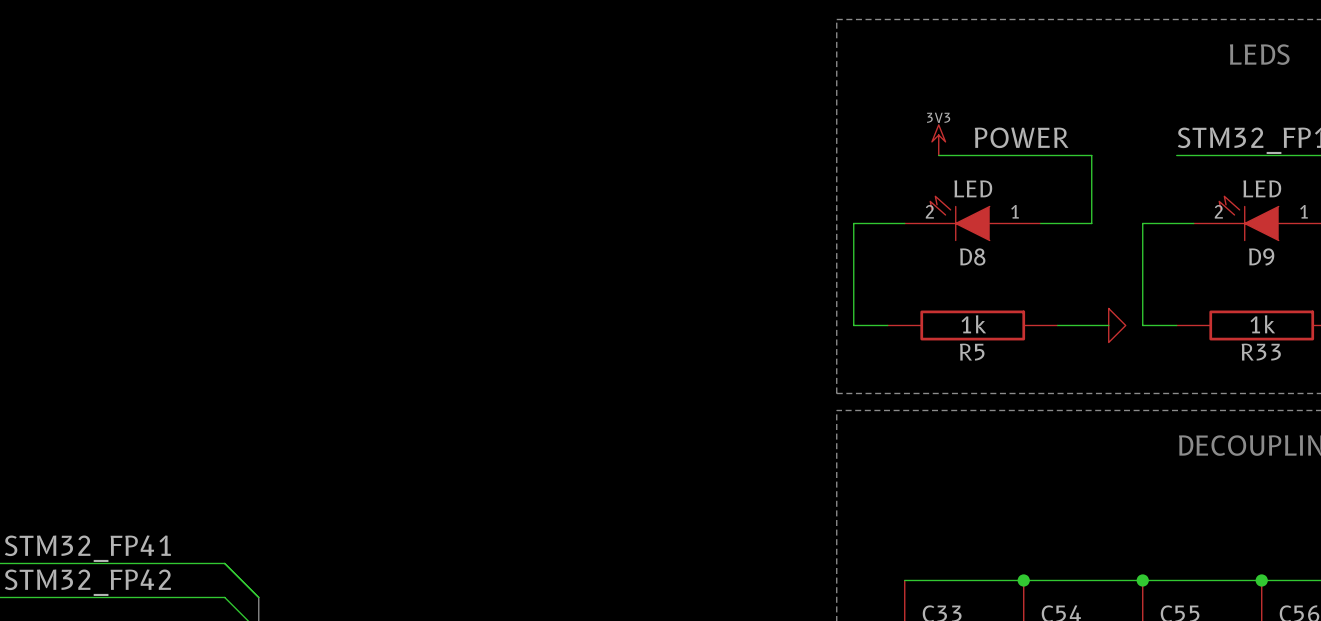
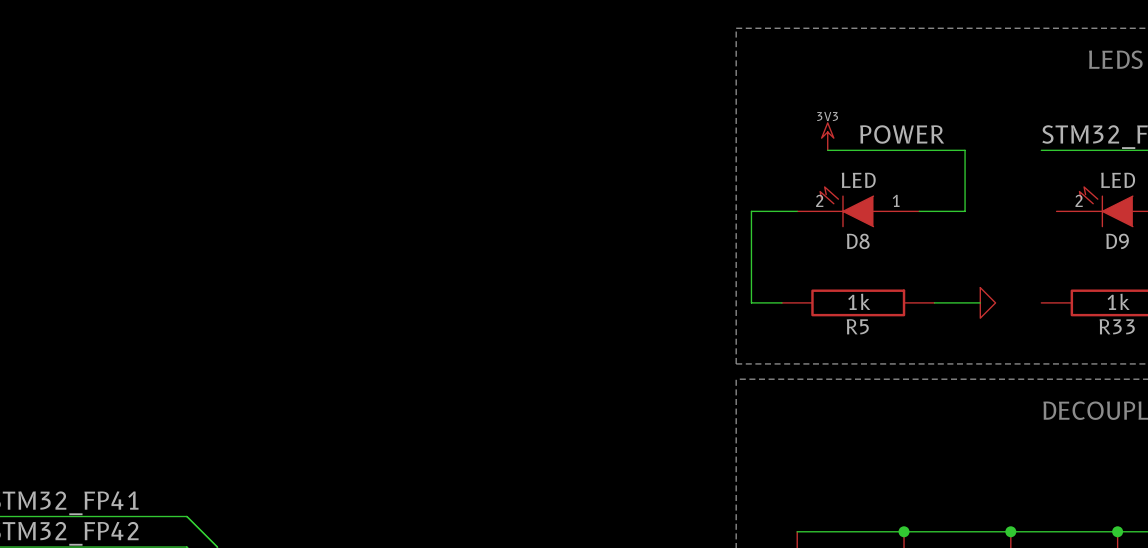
wire: (1193, 223) (1142, 223) (1142, 325) (1176, 325) -> none

